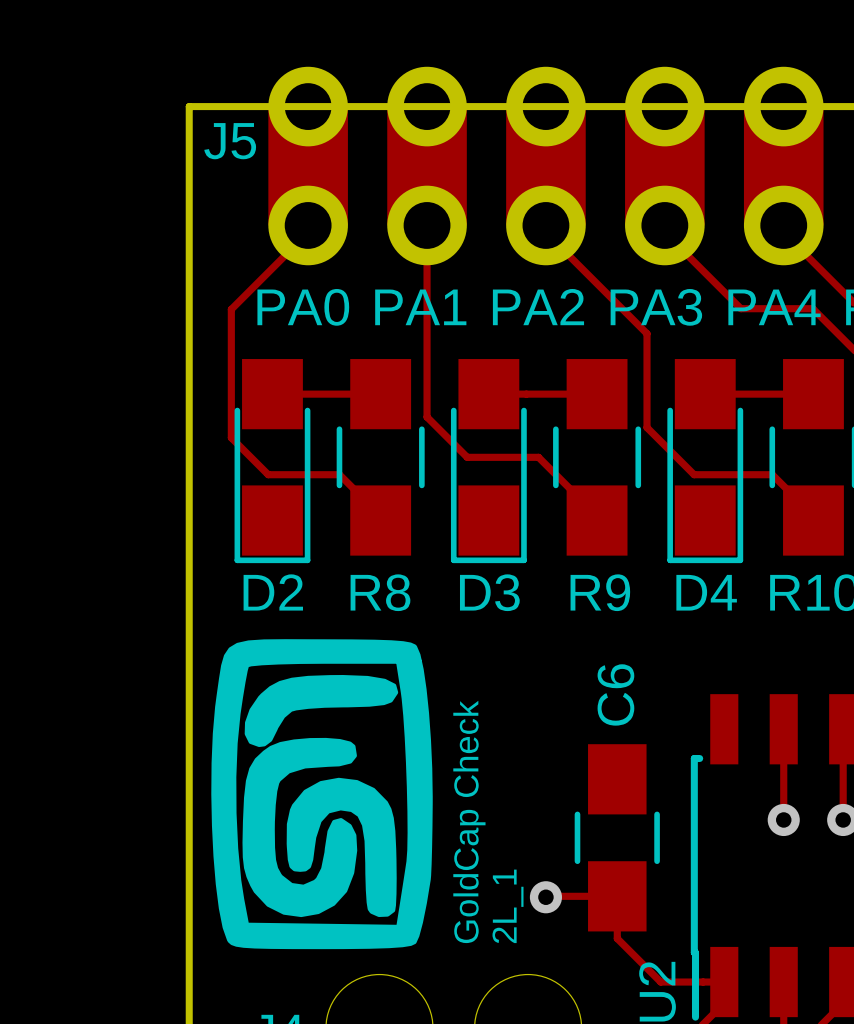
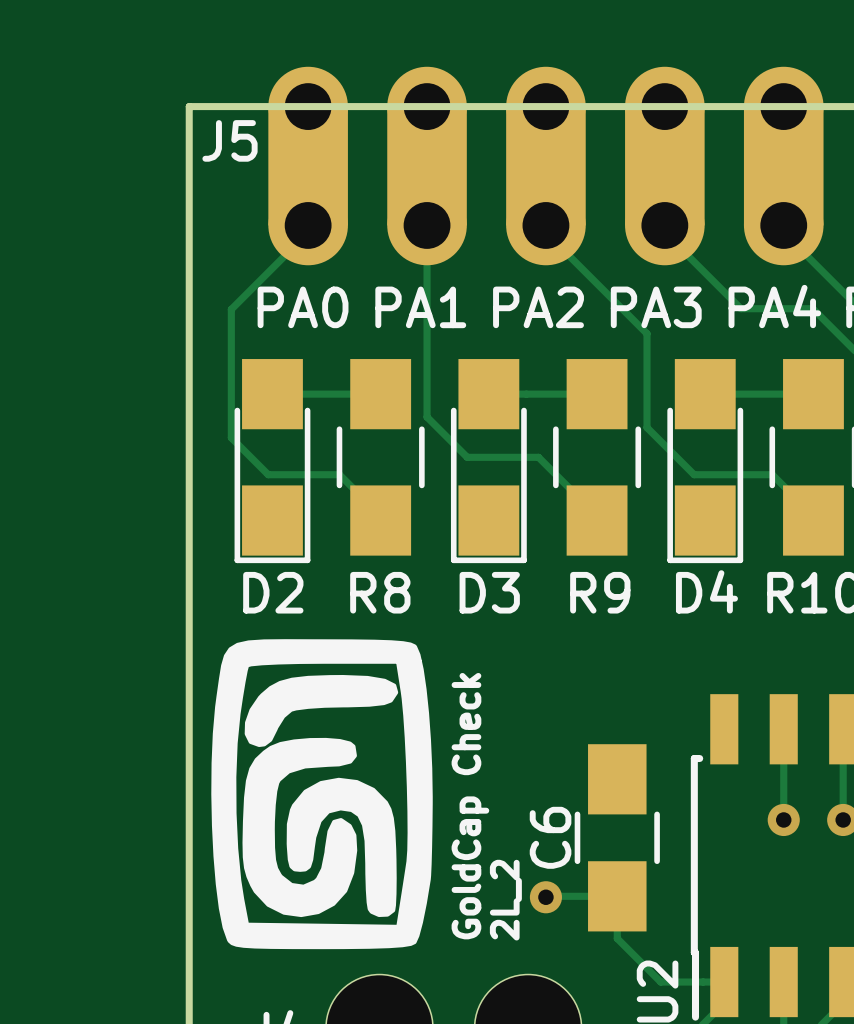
C6 name position: C6 (615, 694) -> C6 (550, 837)
text: 2L_1 (508, 906) -> 2L_2 (505, 900)

